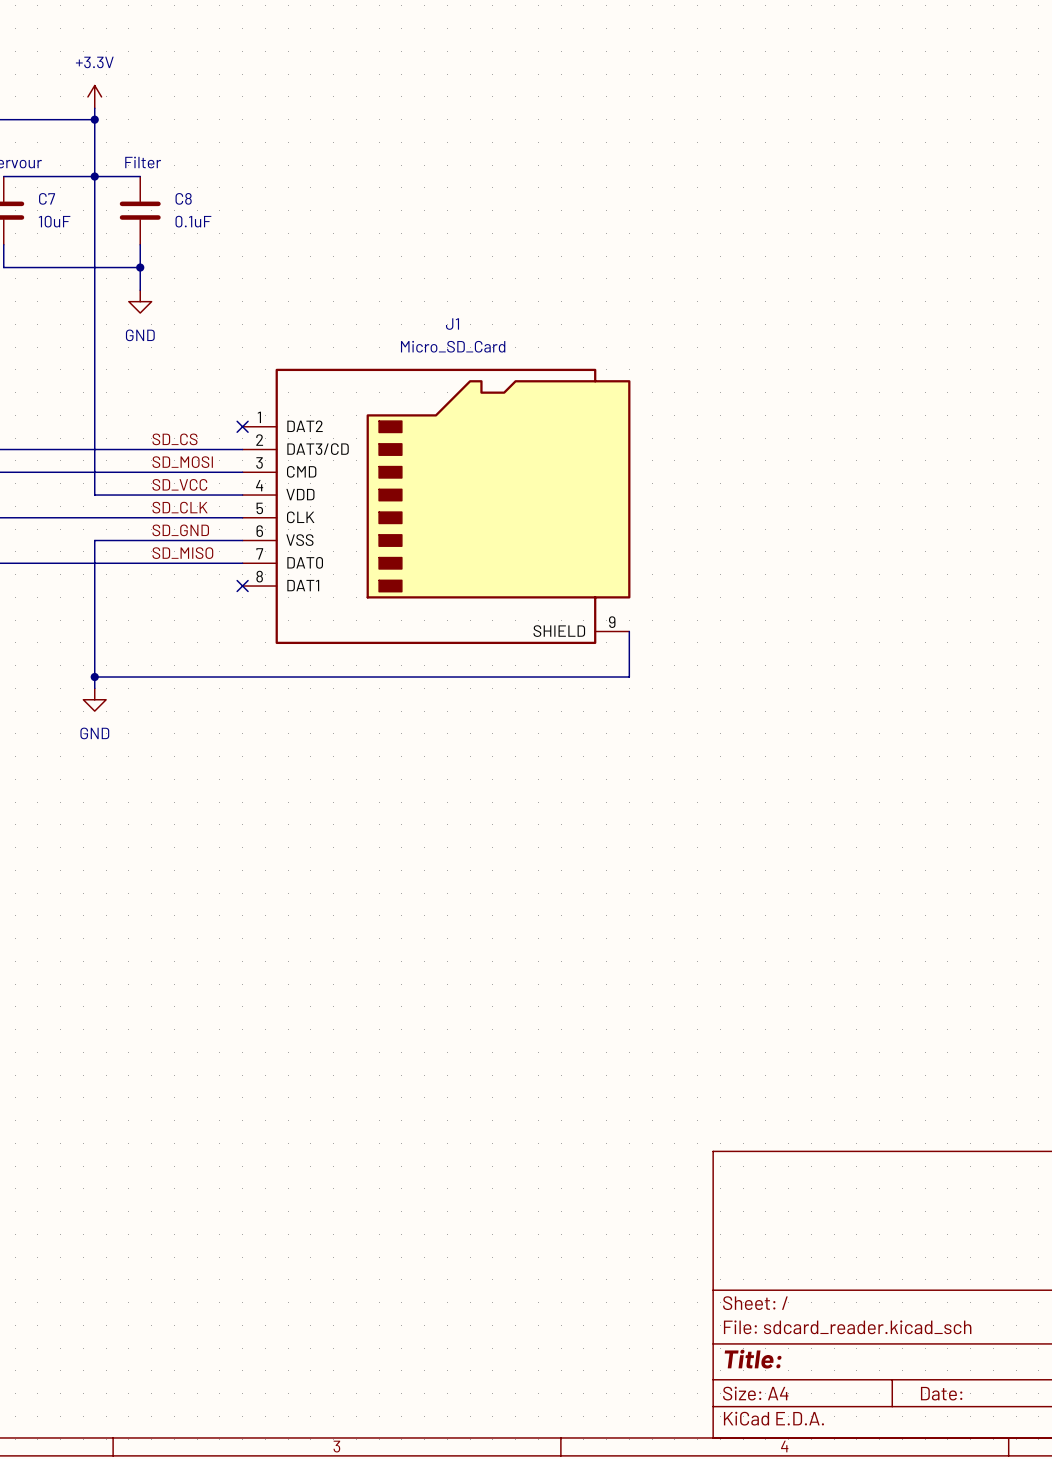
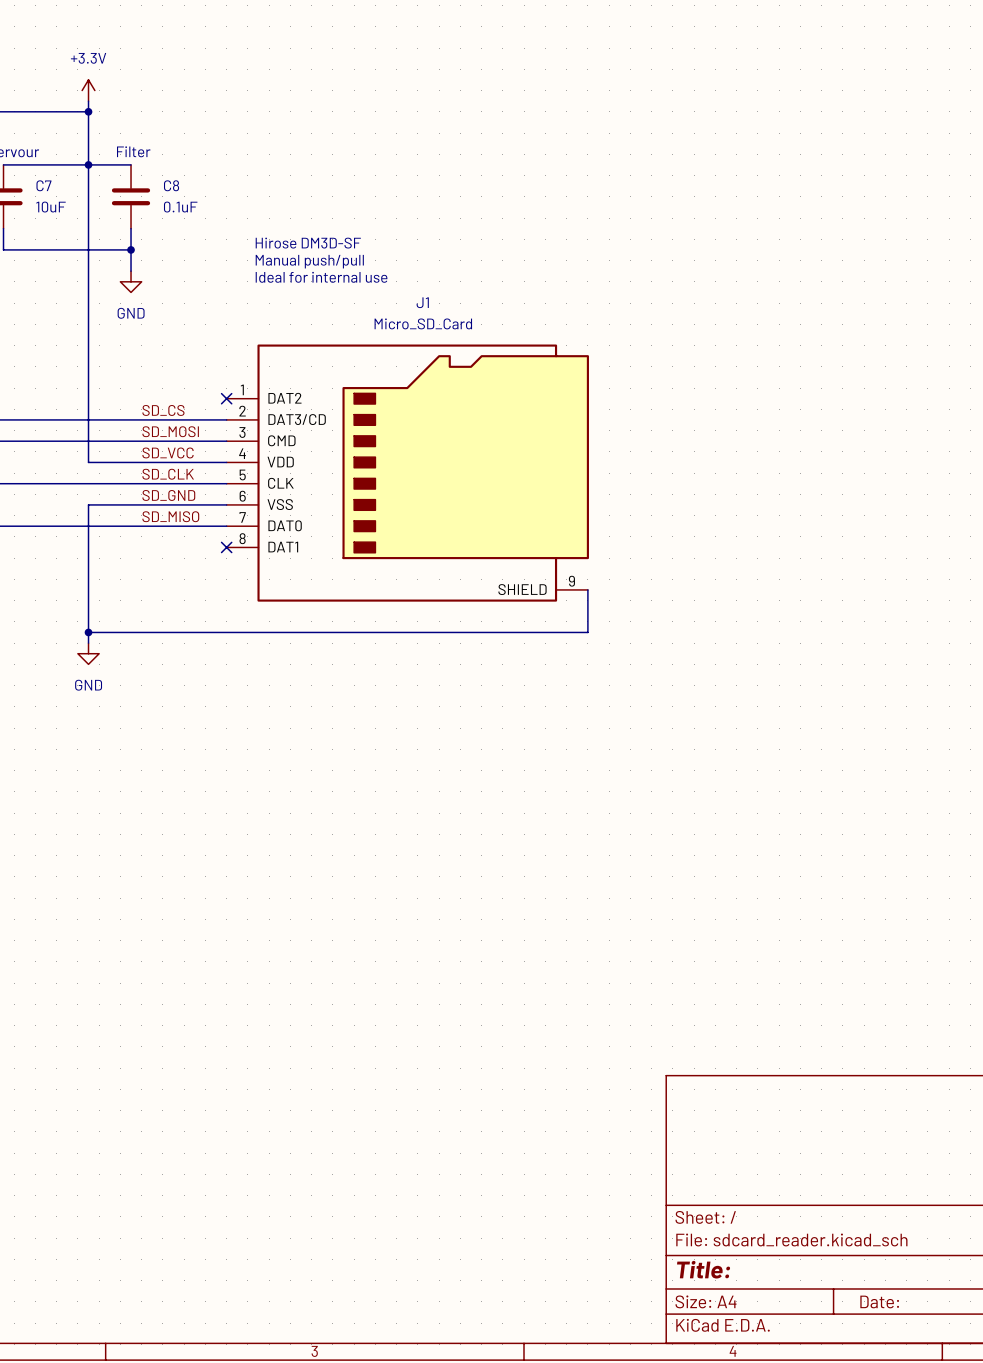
text: none -> Hirose DM3D-SF (308, 243)
text: none -> Manual push/pull (309, 261)
text: none -> Ideal for internal use (321, 277)

